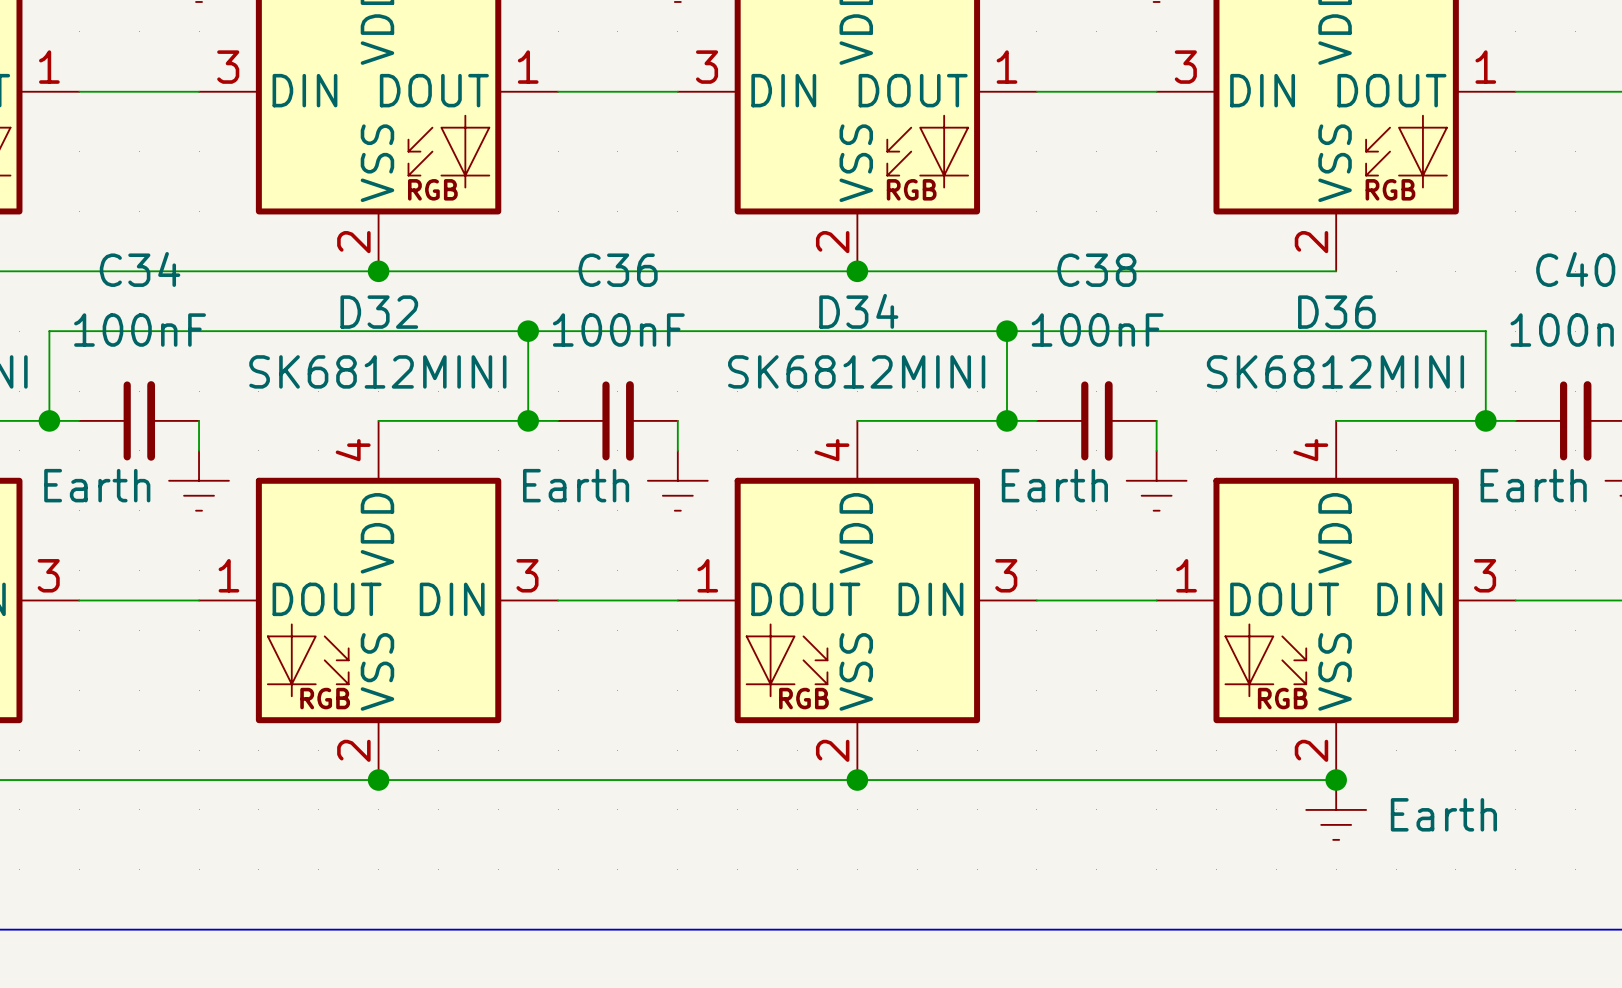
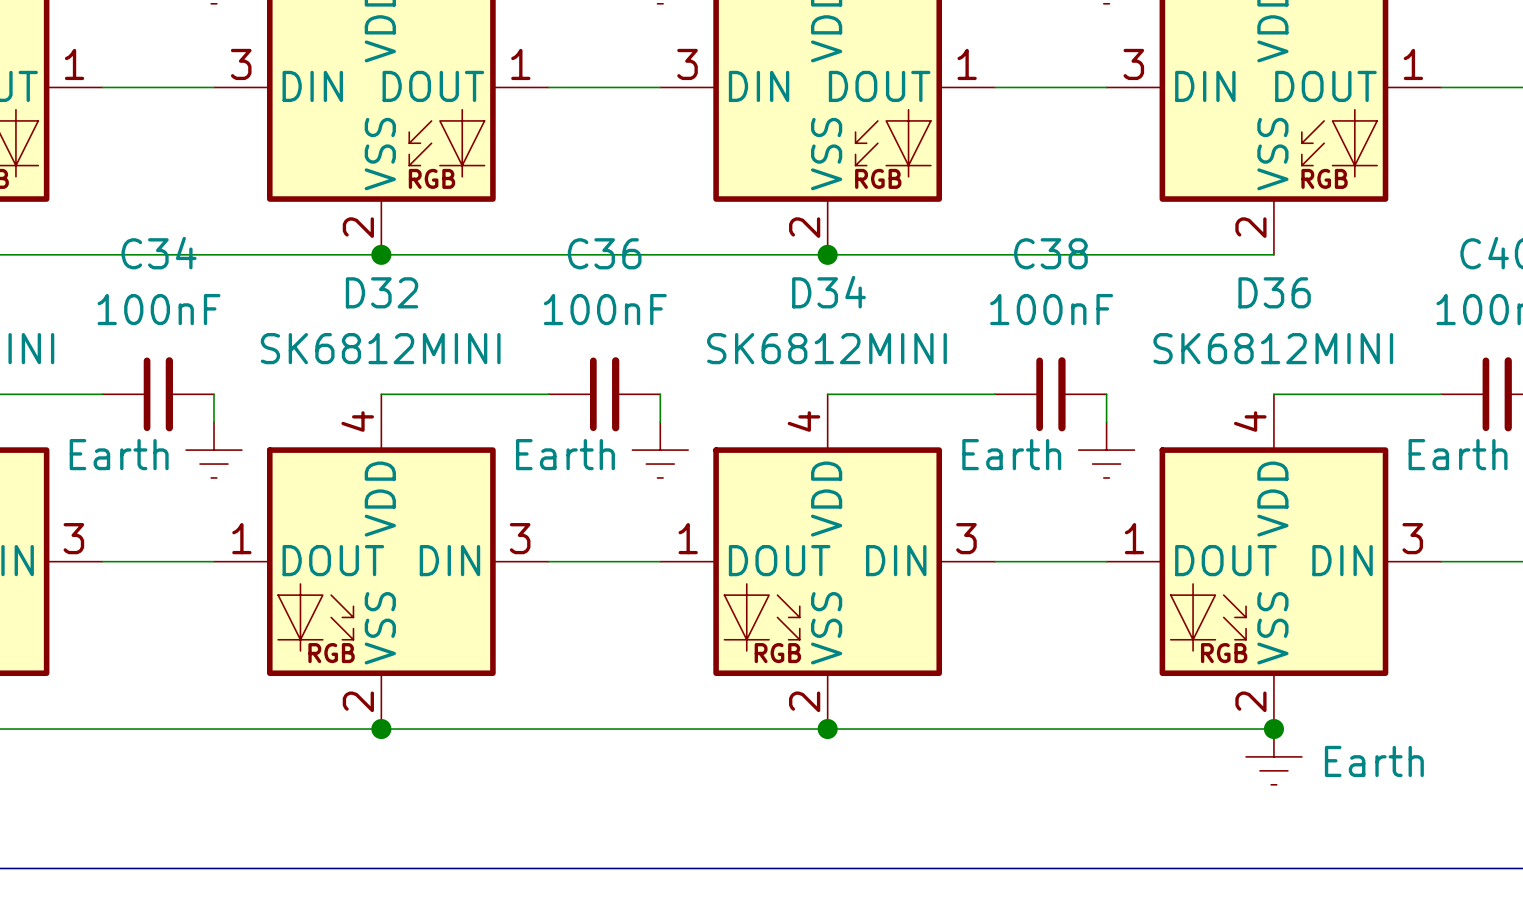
wire: (528, 331) (528, 420) -> none
junction: (528, 331) -> none
wire: (1007, 331) (1007, 420) -> none
junction: (1007, 331) -> none
wire: (49, 420) (49, 331) (1485, 331) (1485, 420) -> none
junction: (49, 420) -> none
junction: (528, 420) -> none
junction: (1007, 420) -> none
junction: (1485, 420) -> none

